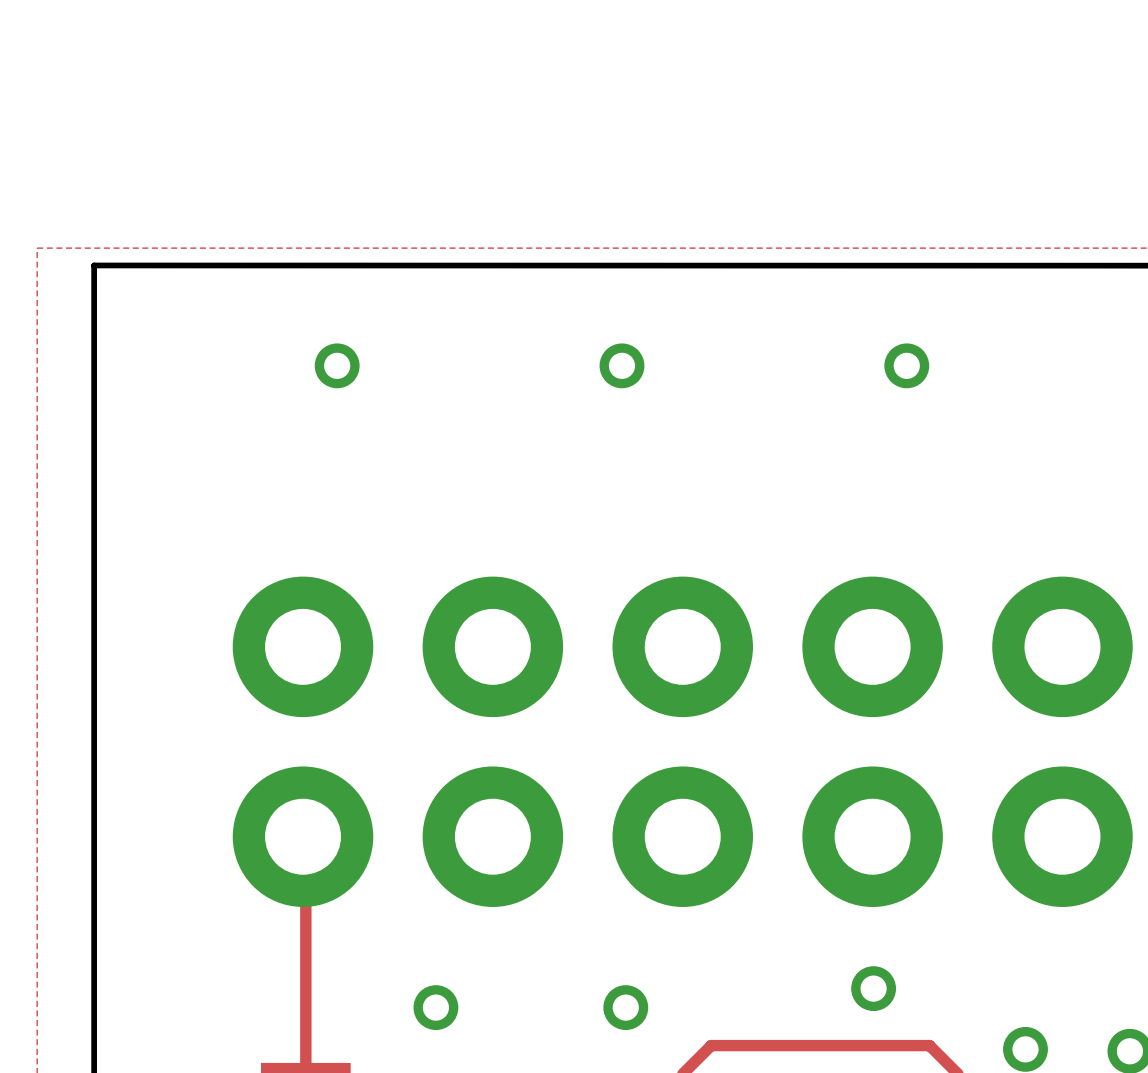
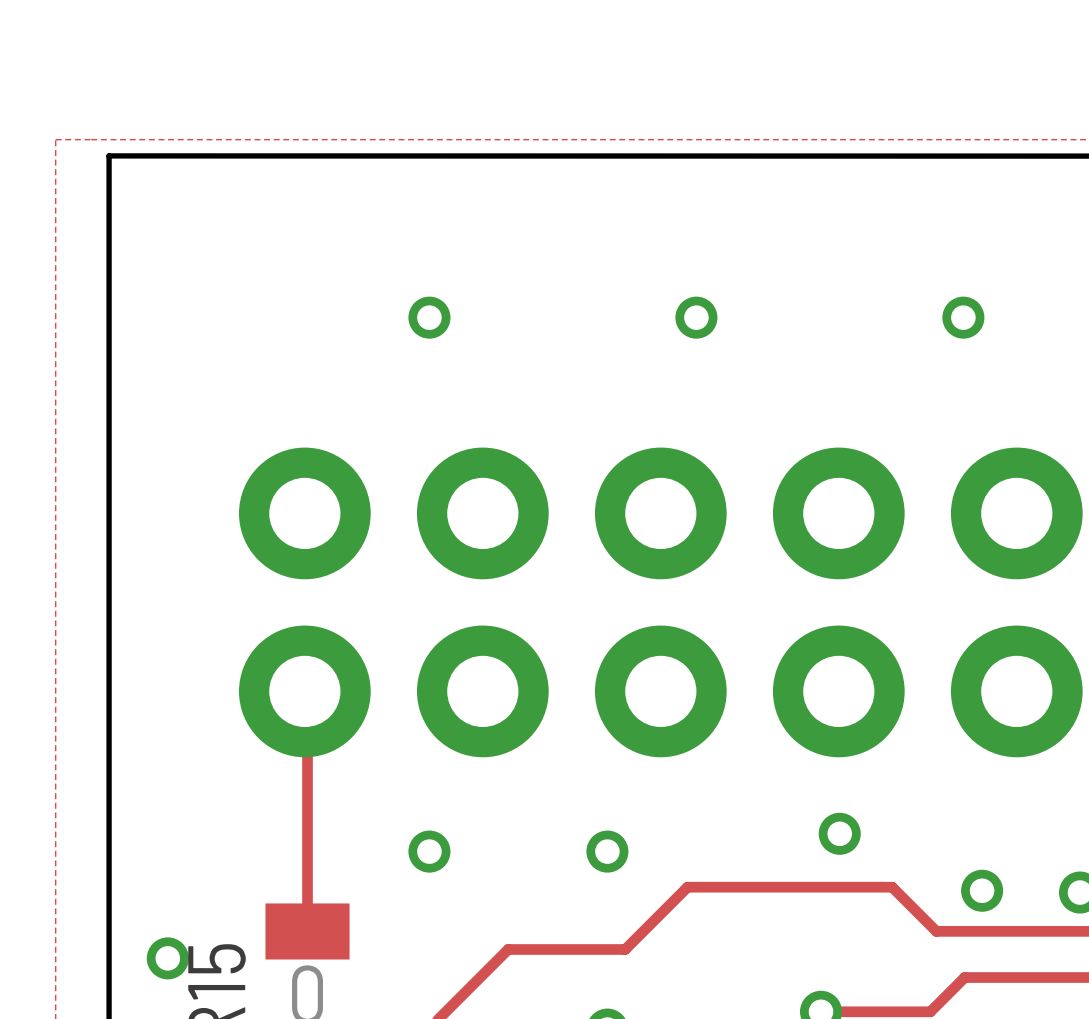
via: (337, 365) -> none
via: (621, 365) -> none
via: (906, 365) -> none
via: none -> (429, 317)
via: none -> (696, 317)
via: none -> (963, 317)

